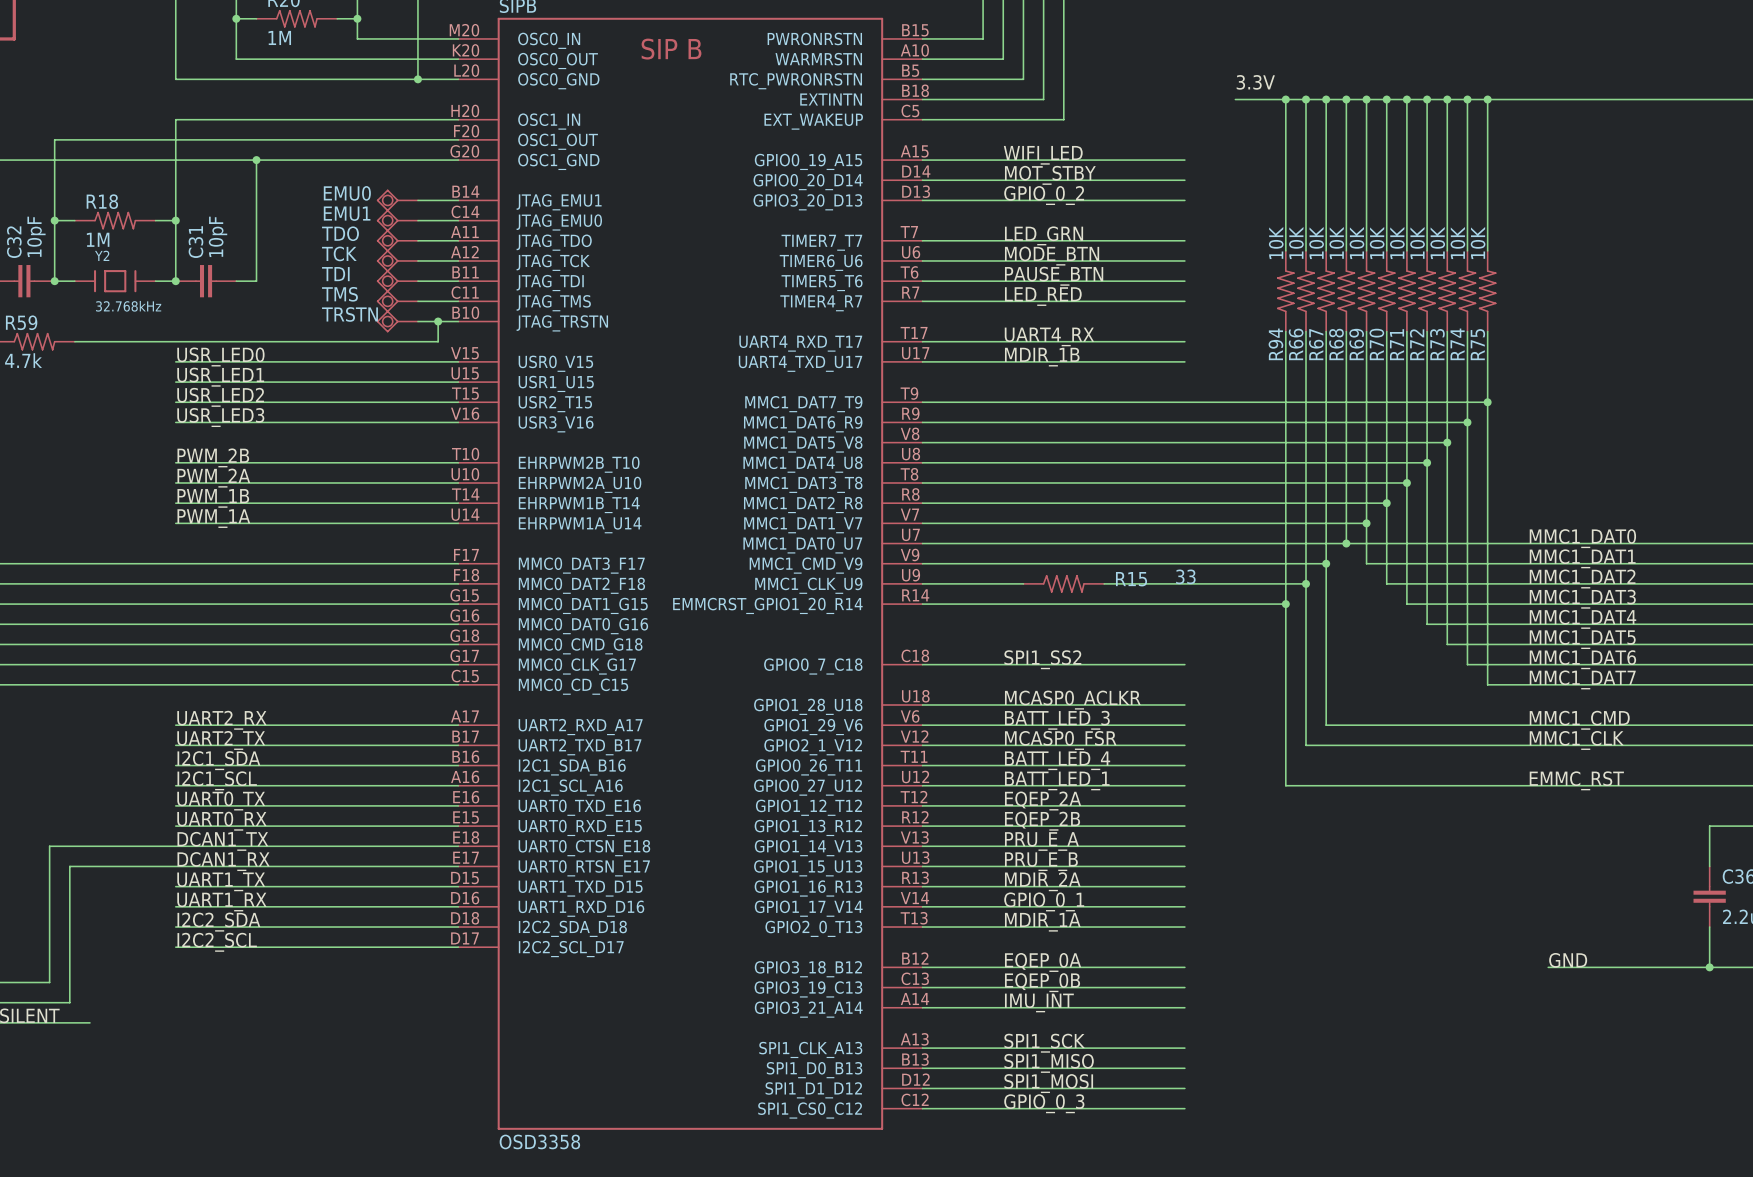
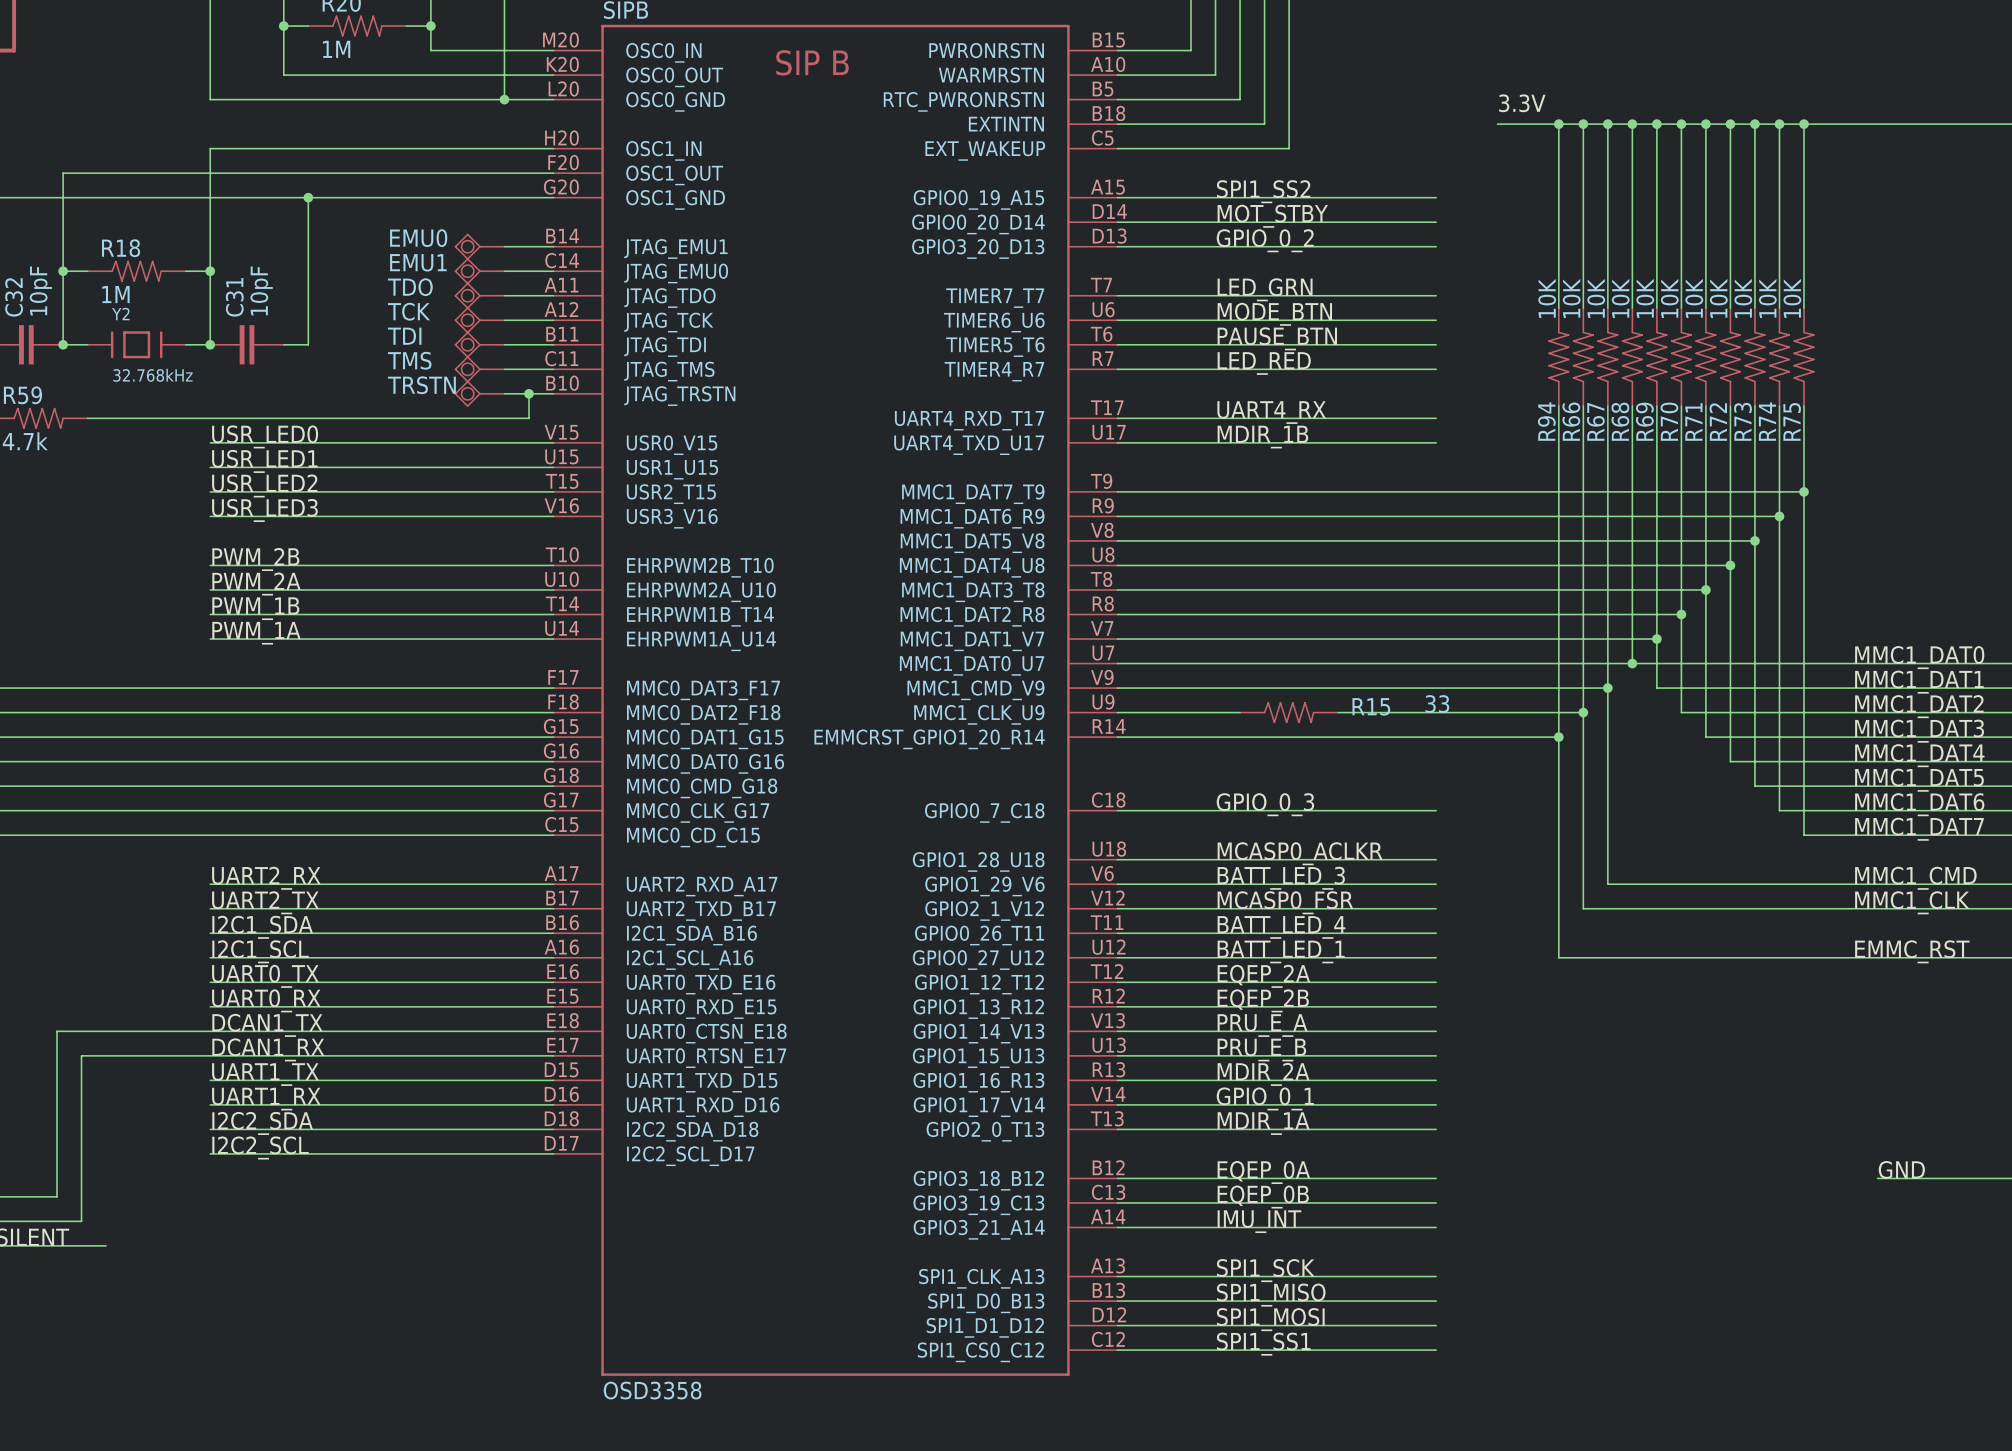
label: WIFI_LED (1043, 155) -> SPI1_SS2 (1263, 191)
label: SPI1_SS2 (1042, 659) -> GPIO_0_3 (1265, 804)
label: GPIO_0_3 (1044, 1103) -> SPI1_SS1 (1263, 1344)

